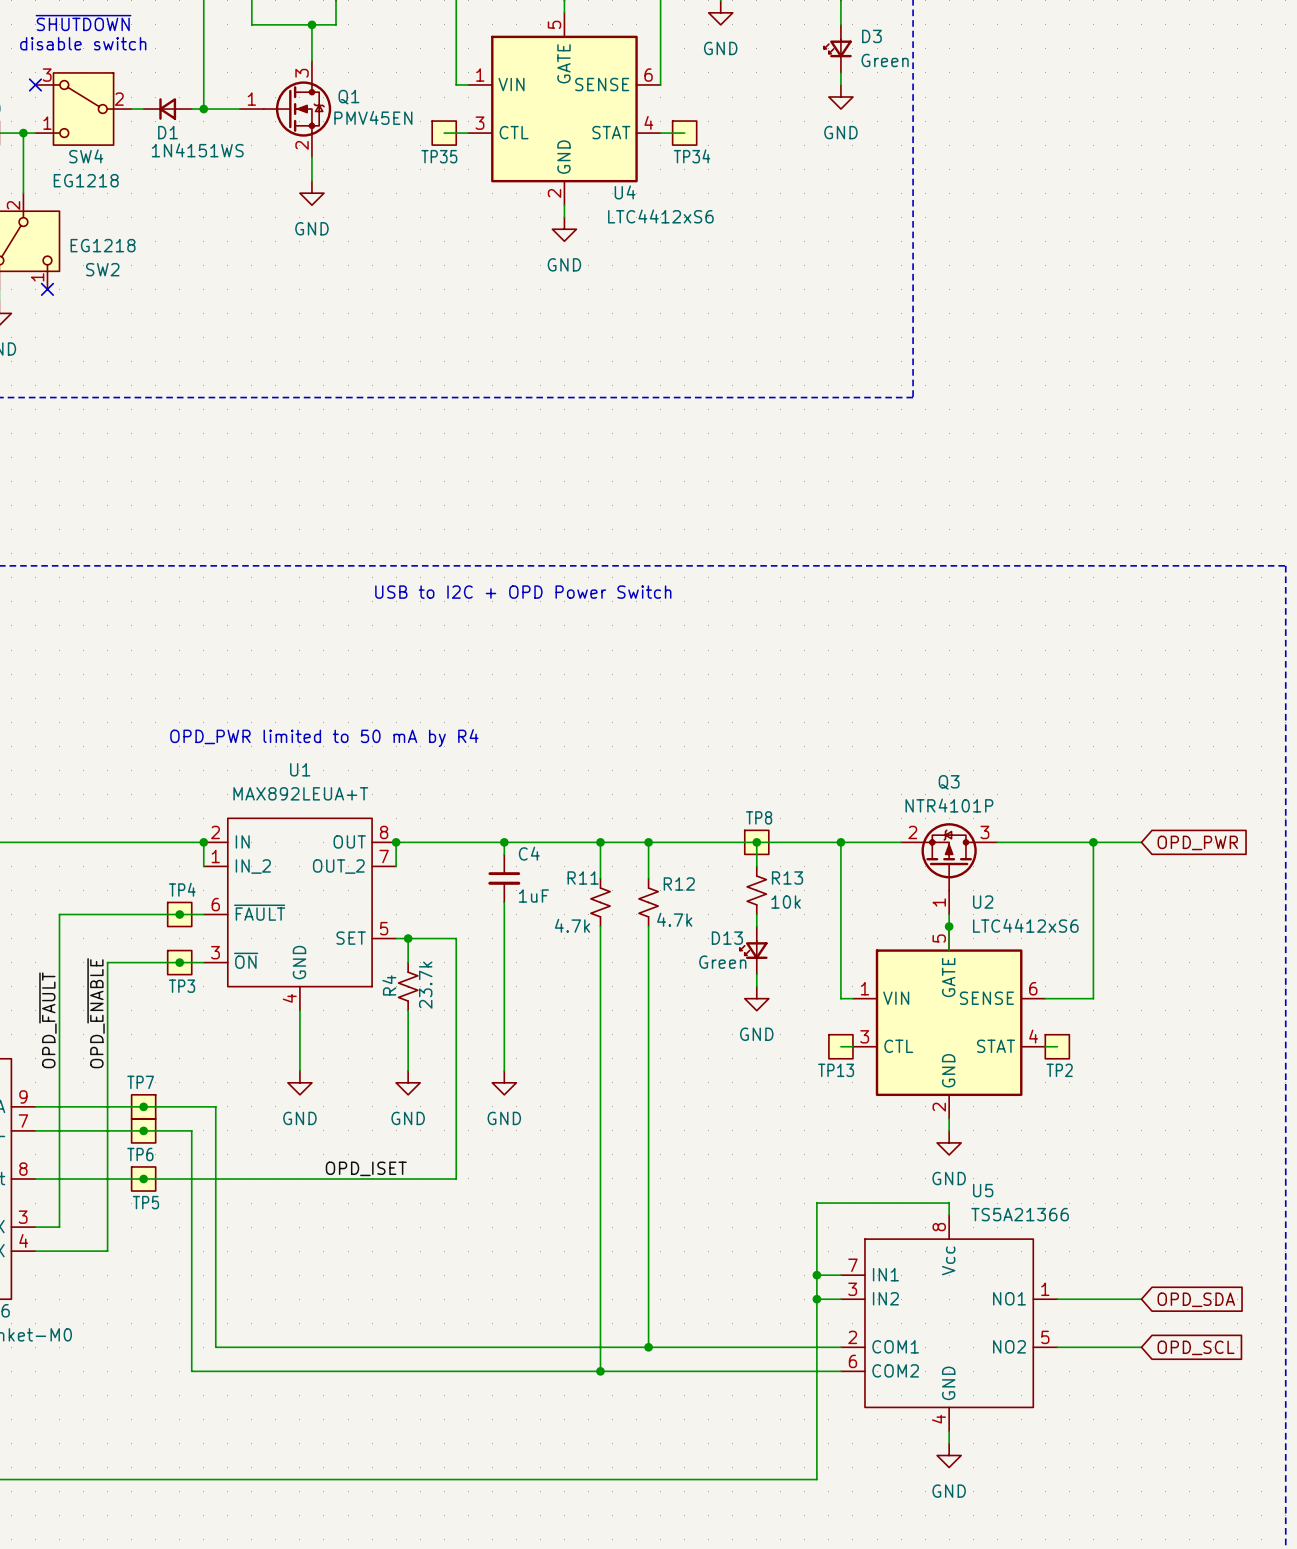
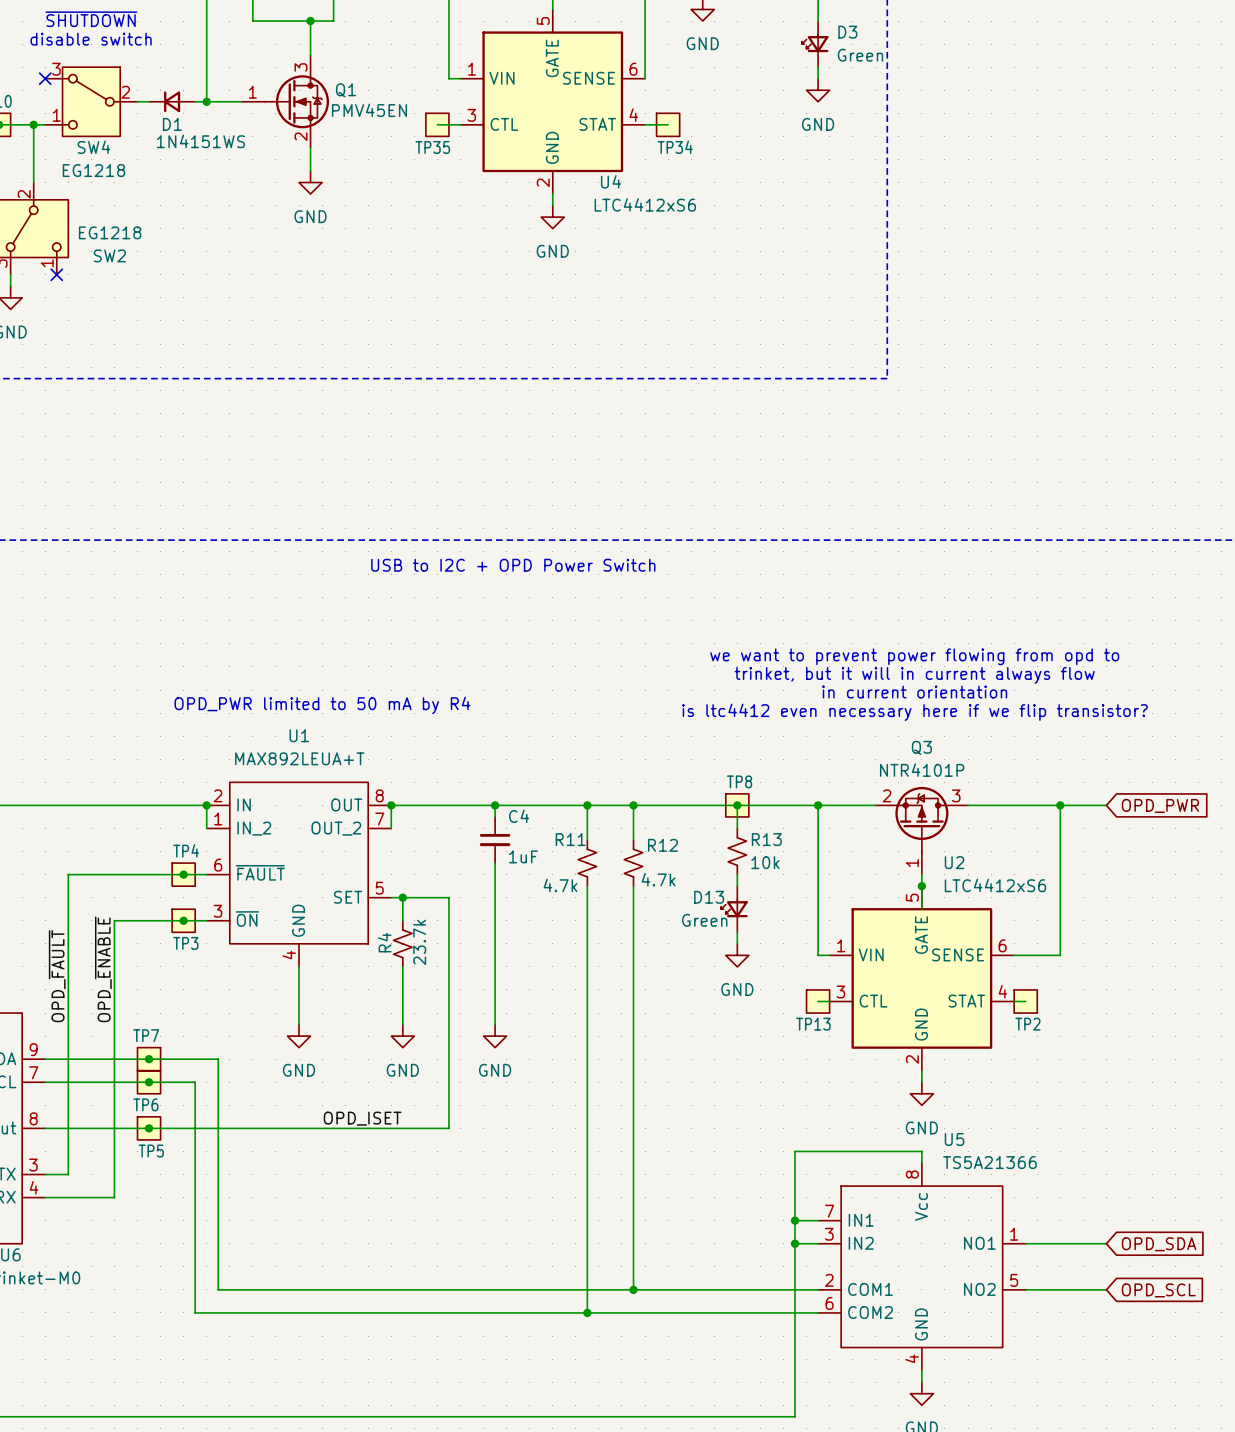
text: none -> we want to prevent power flowing from opd to (914, 656)
text: none -> trinket, but it will in current always flow (914, 675)
text: none -> in current orientation (914, 692)
text: none -> is ltc4412 even necessary here if we flip transistor? (914, 712)

